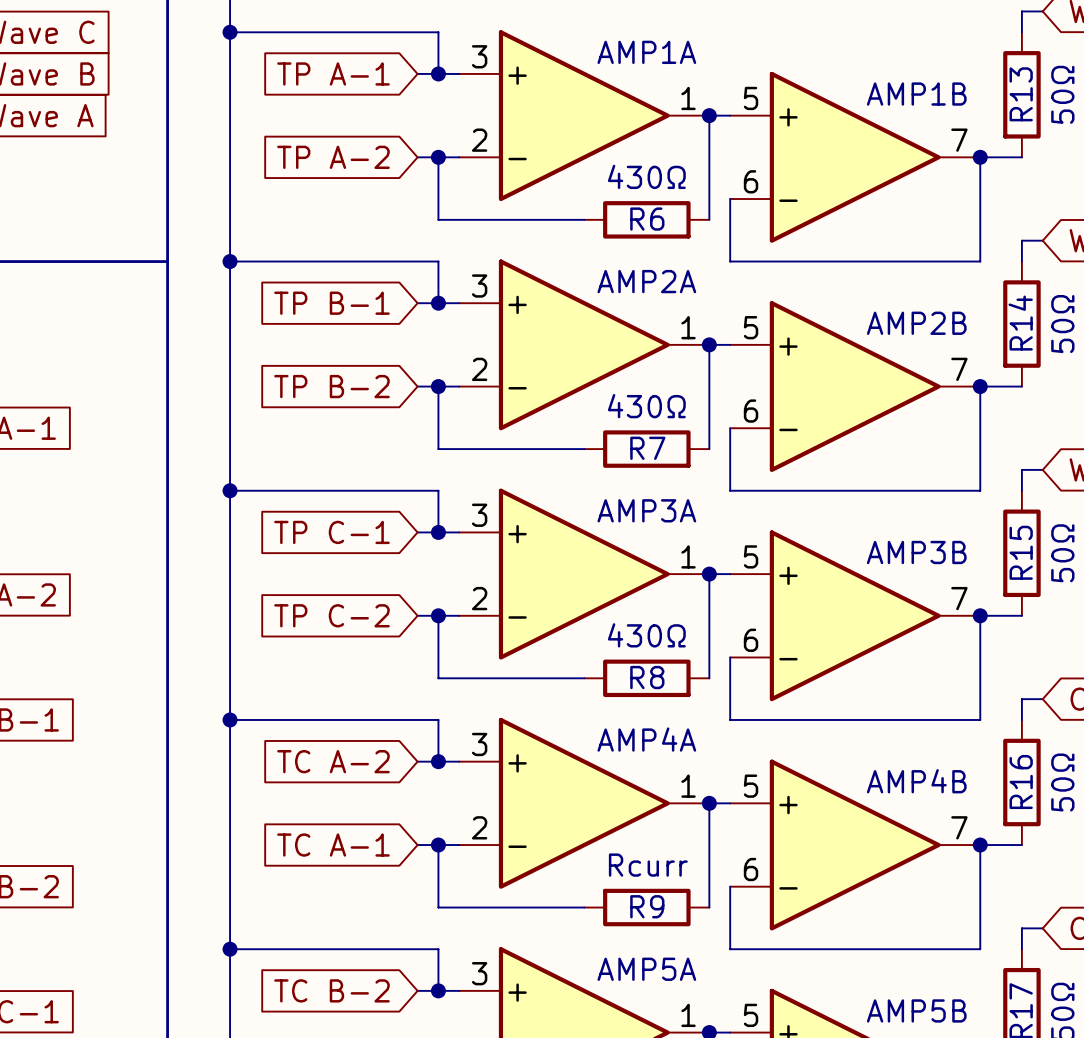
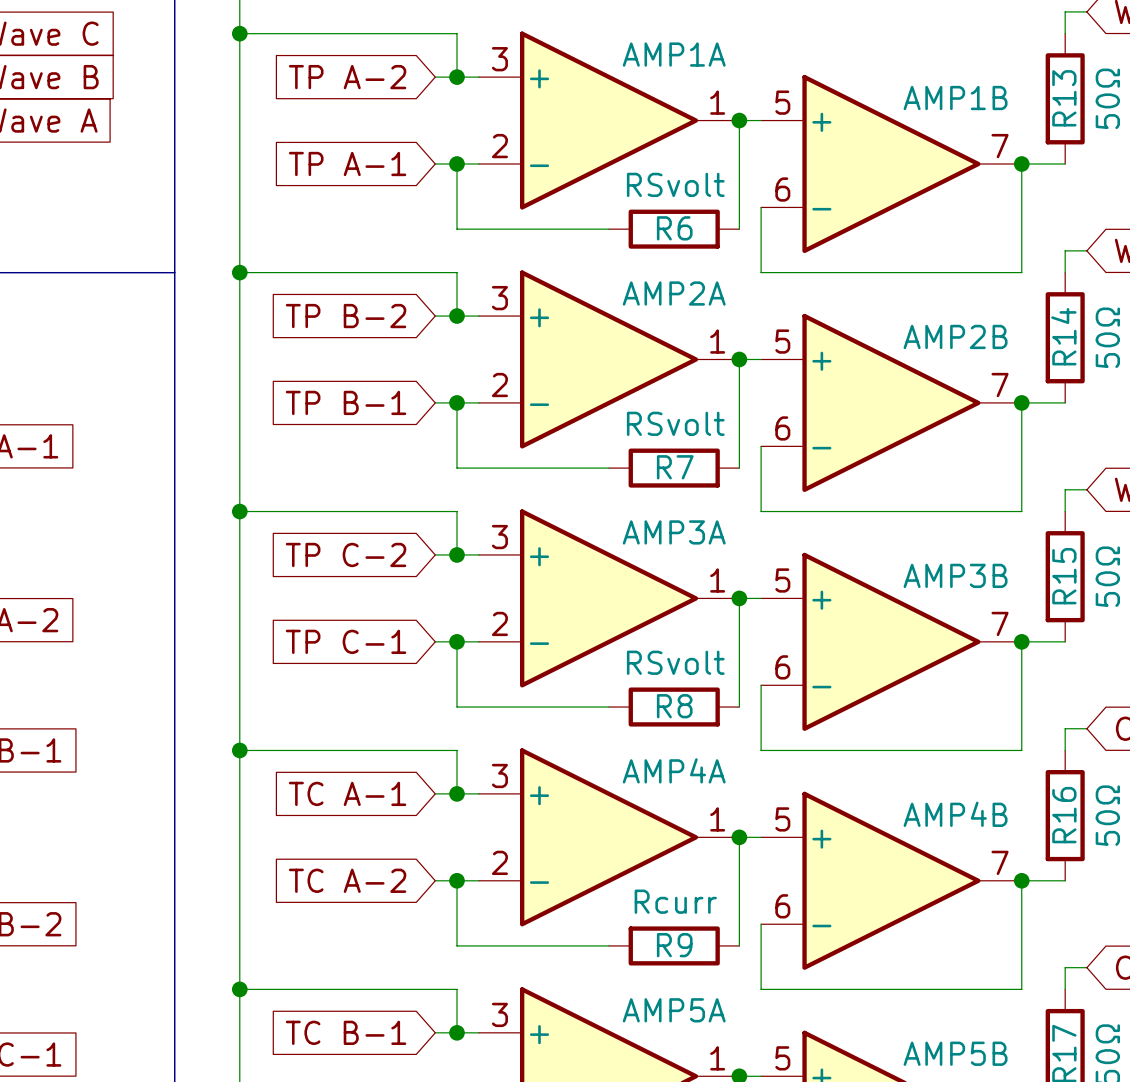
global label: TP A-1 (333, 73) -> TP A-2 (347, 77)
global label: TP A-2 (333, 157) -> TP A-1 (347, 163)
R6 value: 430Ω (646, 176) -> RSvolt (675, 184)
global label: TP B-1 (331, 303) -> TP B-2 (346, 316)
global label: TP B-2 (331, 386) -> TP B-1 (346, 402)
R7 value: 430Ω (646, 406) -> RSvolt (675, 423)
global label: TP C-1 (331, 532) -> TP C-2 (346, 554)
global label: TP C-2 (331, 615) -> TP C-1 (346, 641)
R8 value: 430Ω (646, 635) -> RSvolt (675, 662)
global label: TC A-2 (333, 761) -> TC A-1 (347, 793)
global label: TC A-1 (333, 845) -> TC A-2 (347, 880)
global label: TC B-2 (331, 990) -> TC B-1 (346, 1032)

